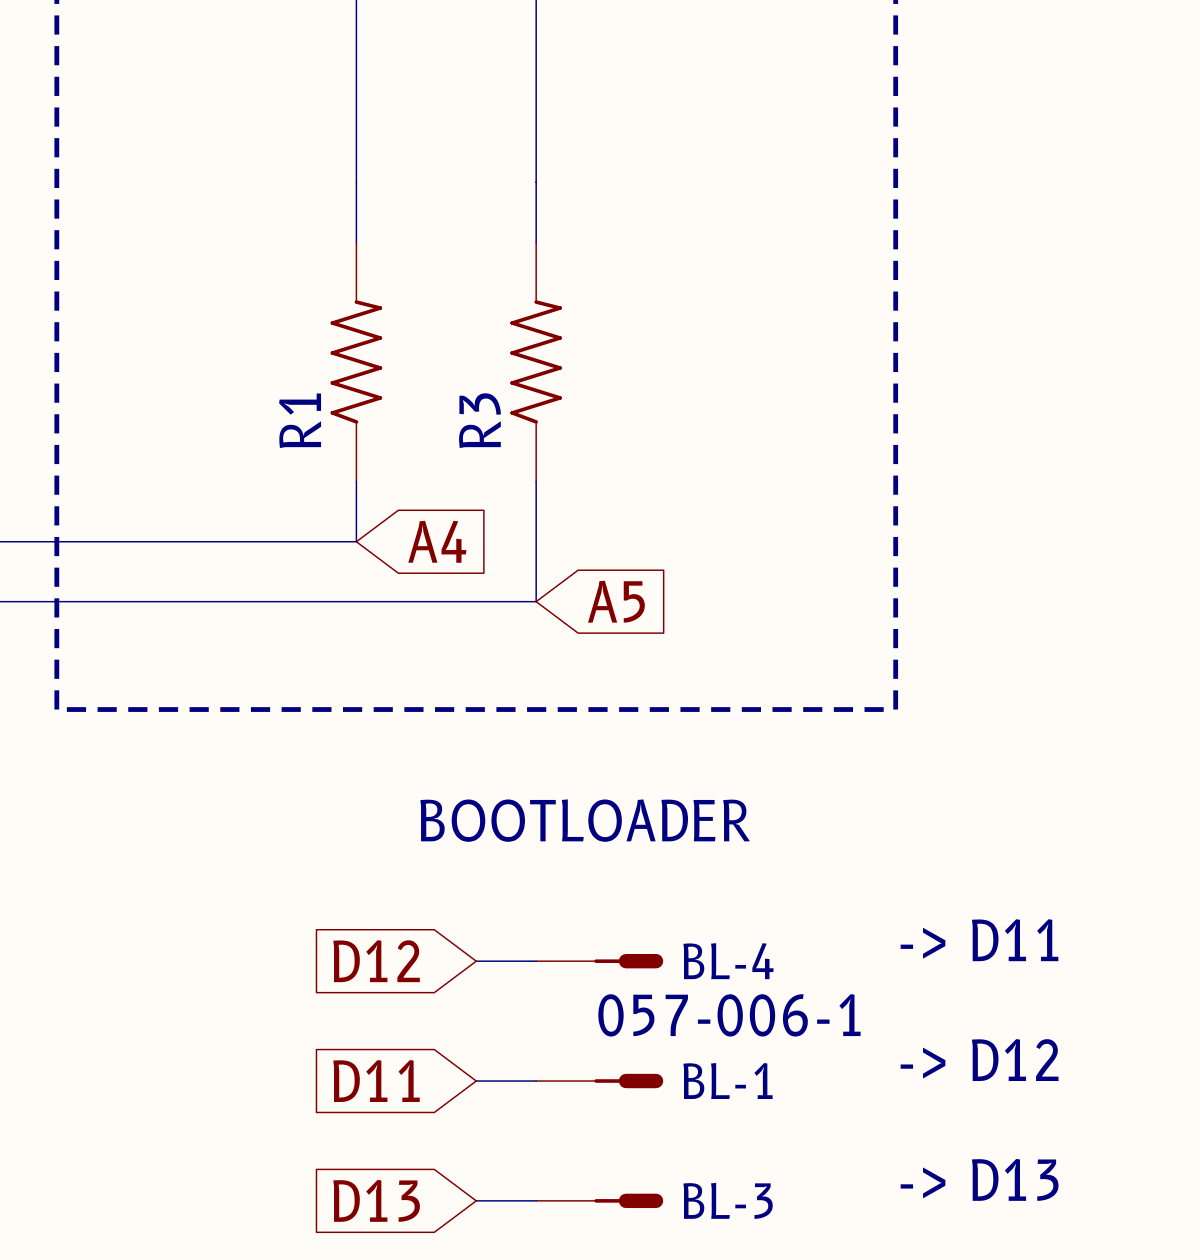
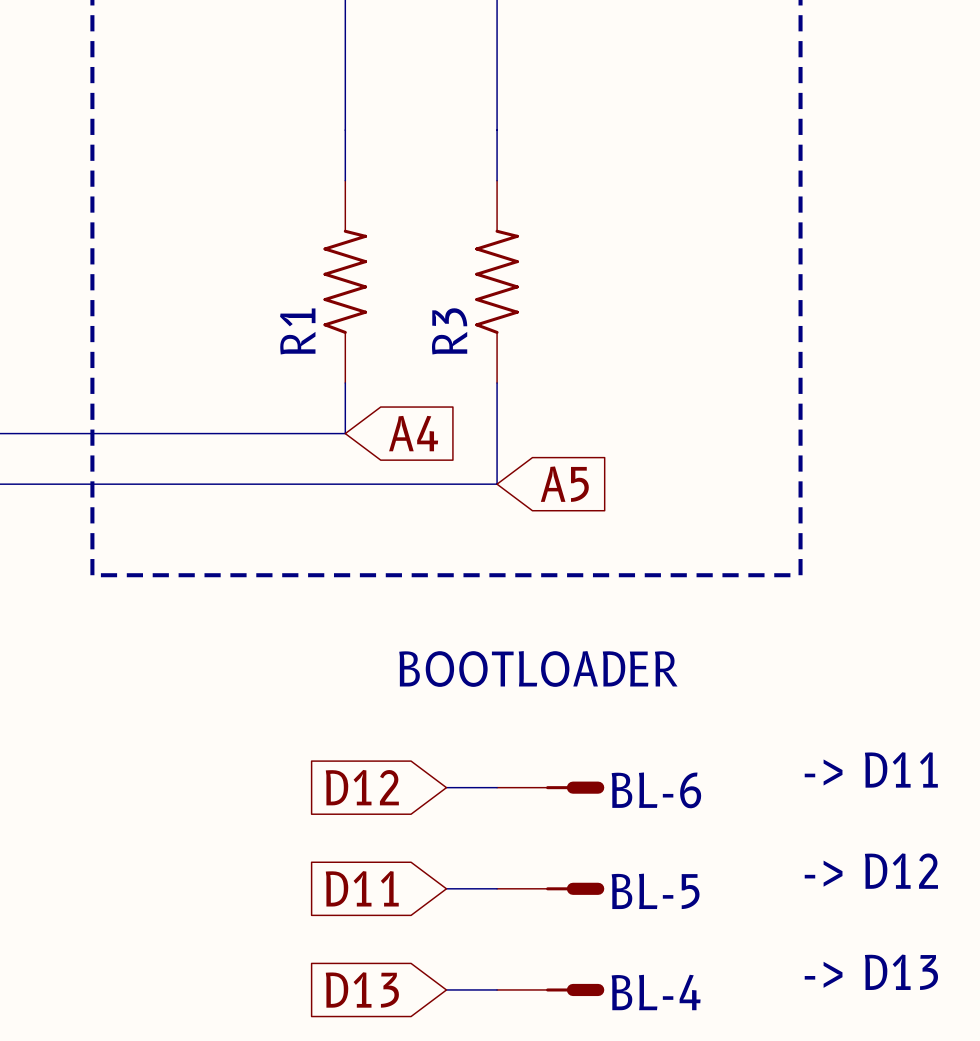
BL-4 name: BL-4 (728, 961) -> BL-6 (656, 790)
BL-1 value: 057-006-1 (729, 1015) -> none
BL-1 name: BL-1 (727, 1081) -> BL-5 (655, 891)
BL-3 name: BL-3 (728, 1200) -> BL-4 (656, 992)

